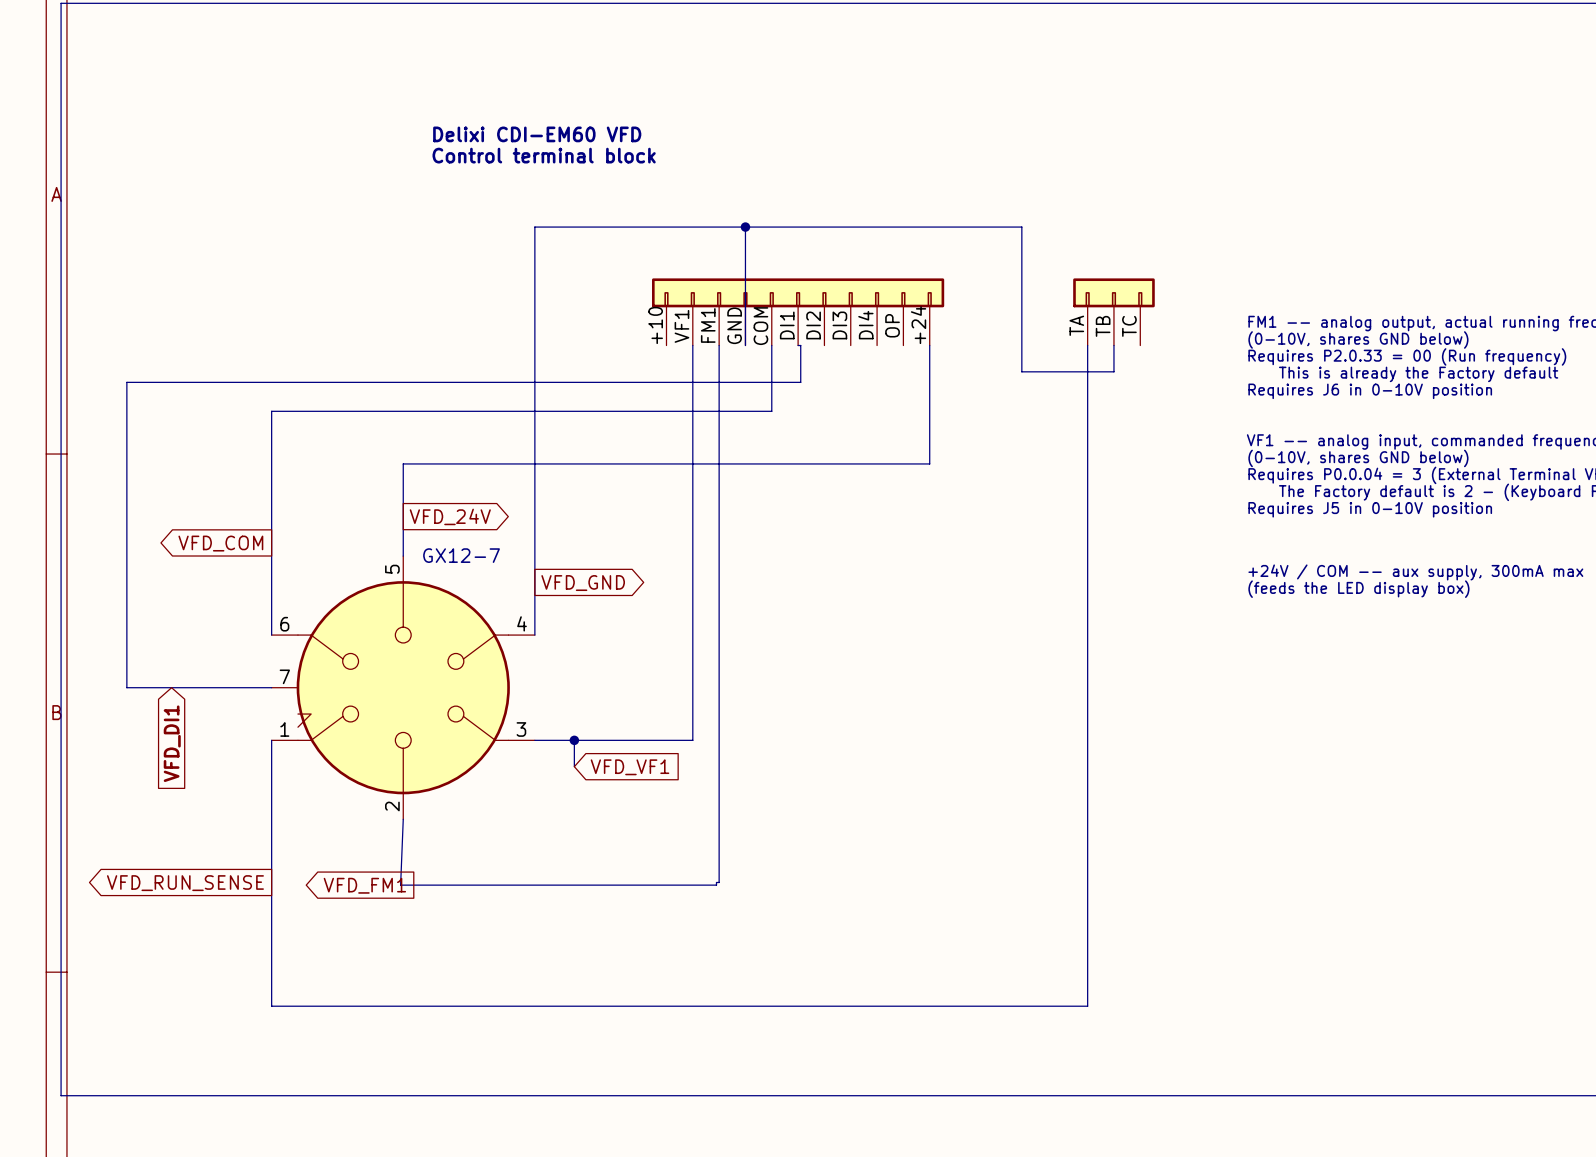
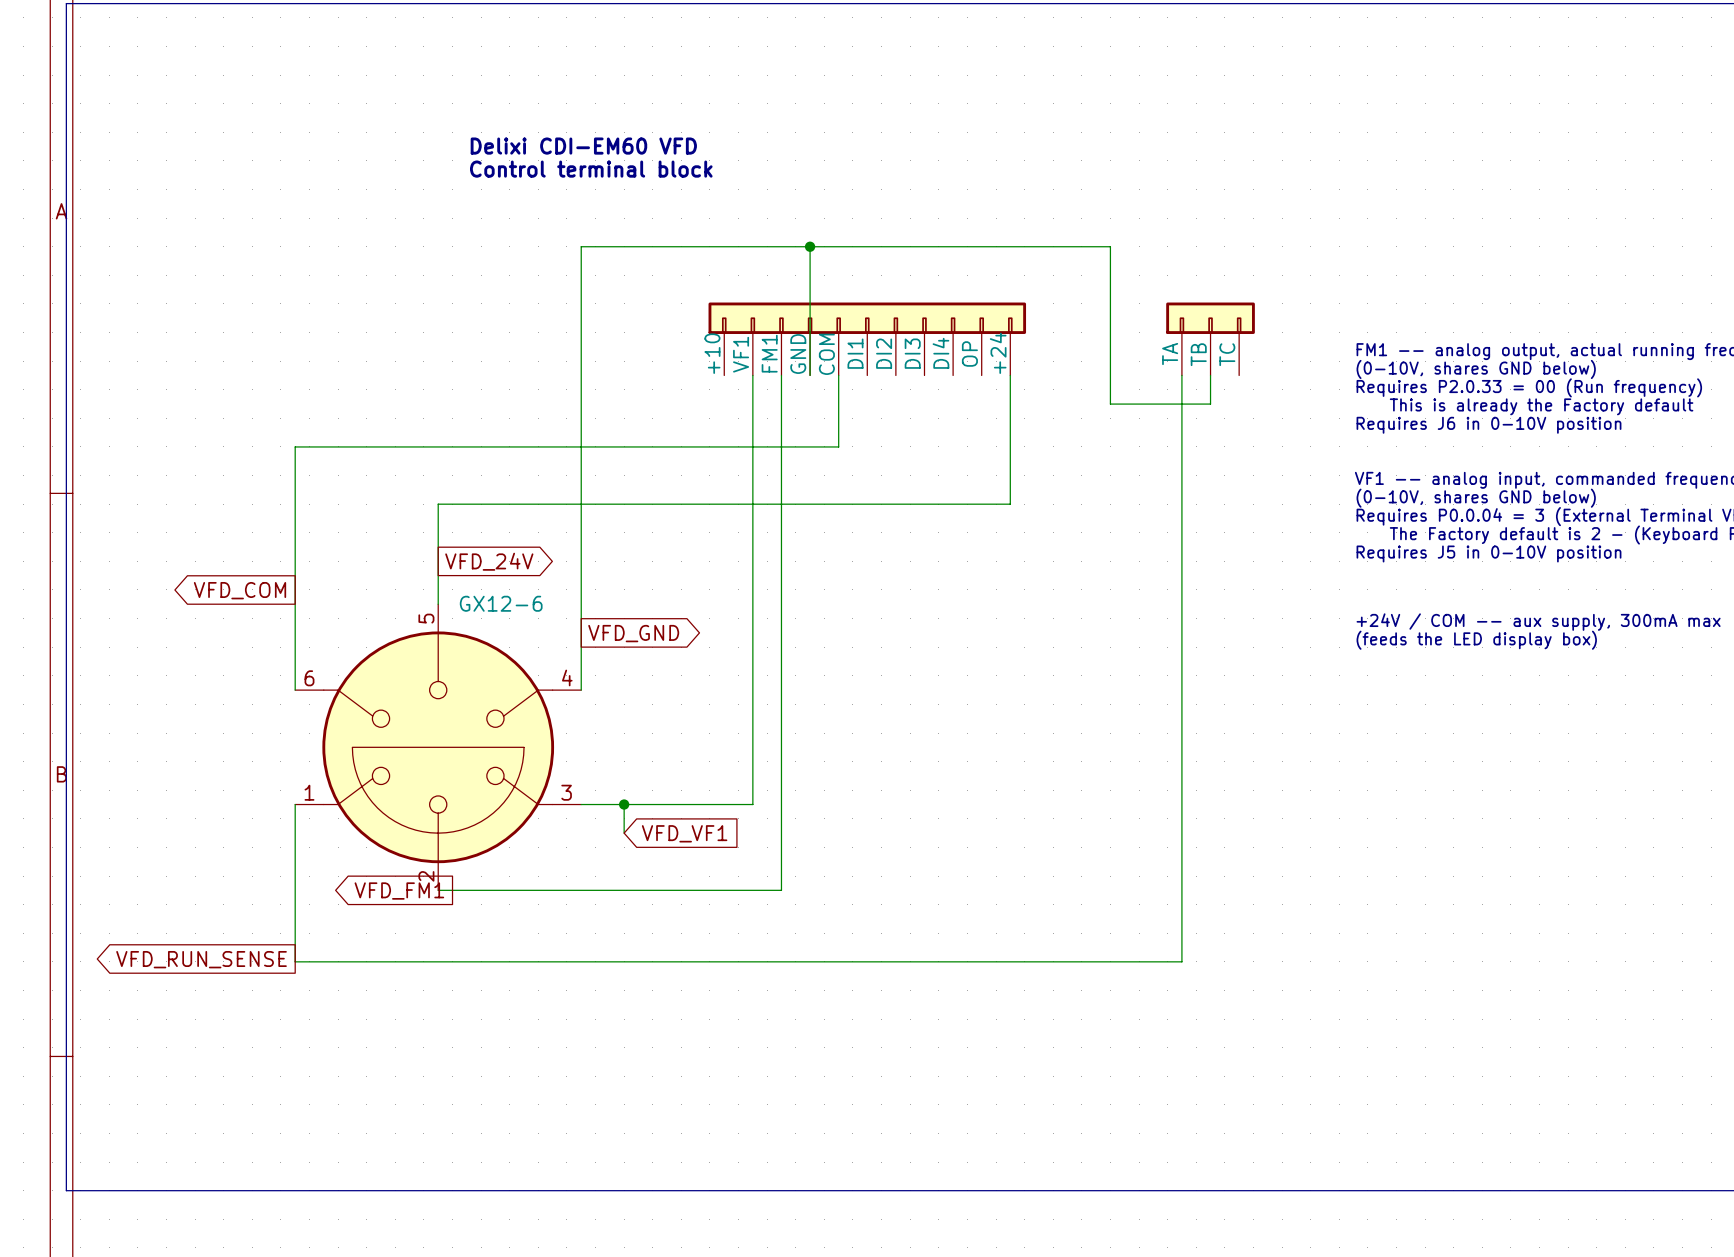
wire: (798, 345) (800, 345) (800, 382) (126, 382) (126, 687) (271, 687) -> none
part value: GX12-7 (461, 555) -> GX12-6 (501, 603)
part symbol: [271, 556, 535, 820] -> [295, 604, 582, 891]
global label: VFD_DI1 (172, 743) -> none
wire: (403, 819) (400, 885) -> (295, 961) (435, 961)
wire: (719, 819) (719, 882) (716, 882) (716, 885) -> (781, 890) (438, 890)
wire: (271, 885) (271, 1006) (1087, 1006) (1087, 885) -> (778, 961) (1181, 961)
global label position: VFD_FM1 (364, 885) -> VFD_FM1 (399, 891)

